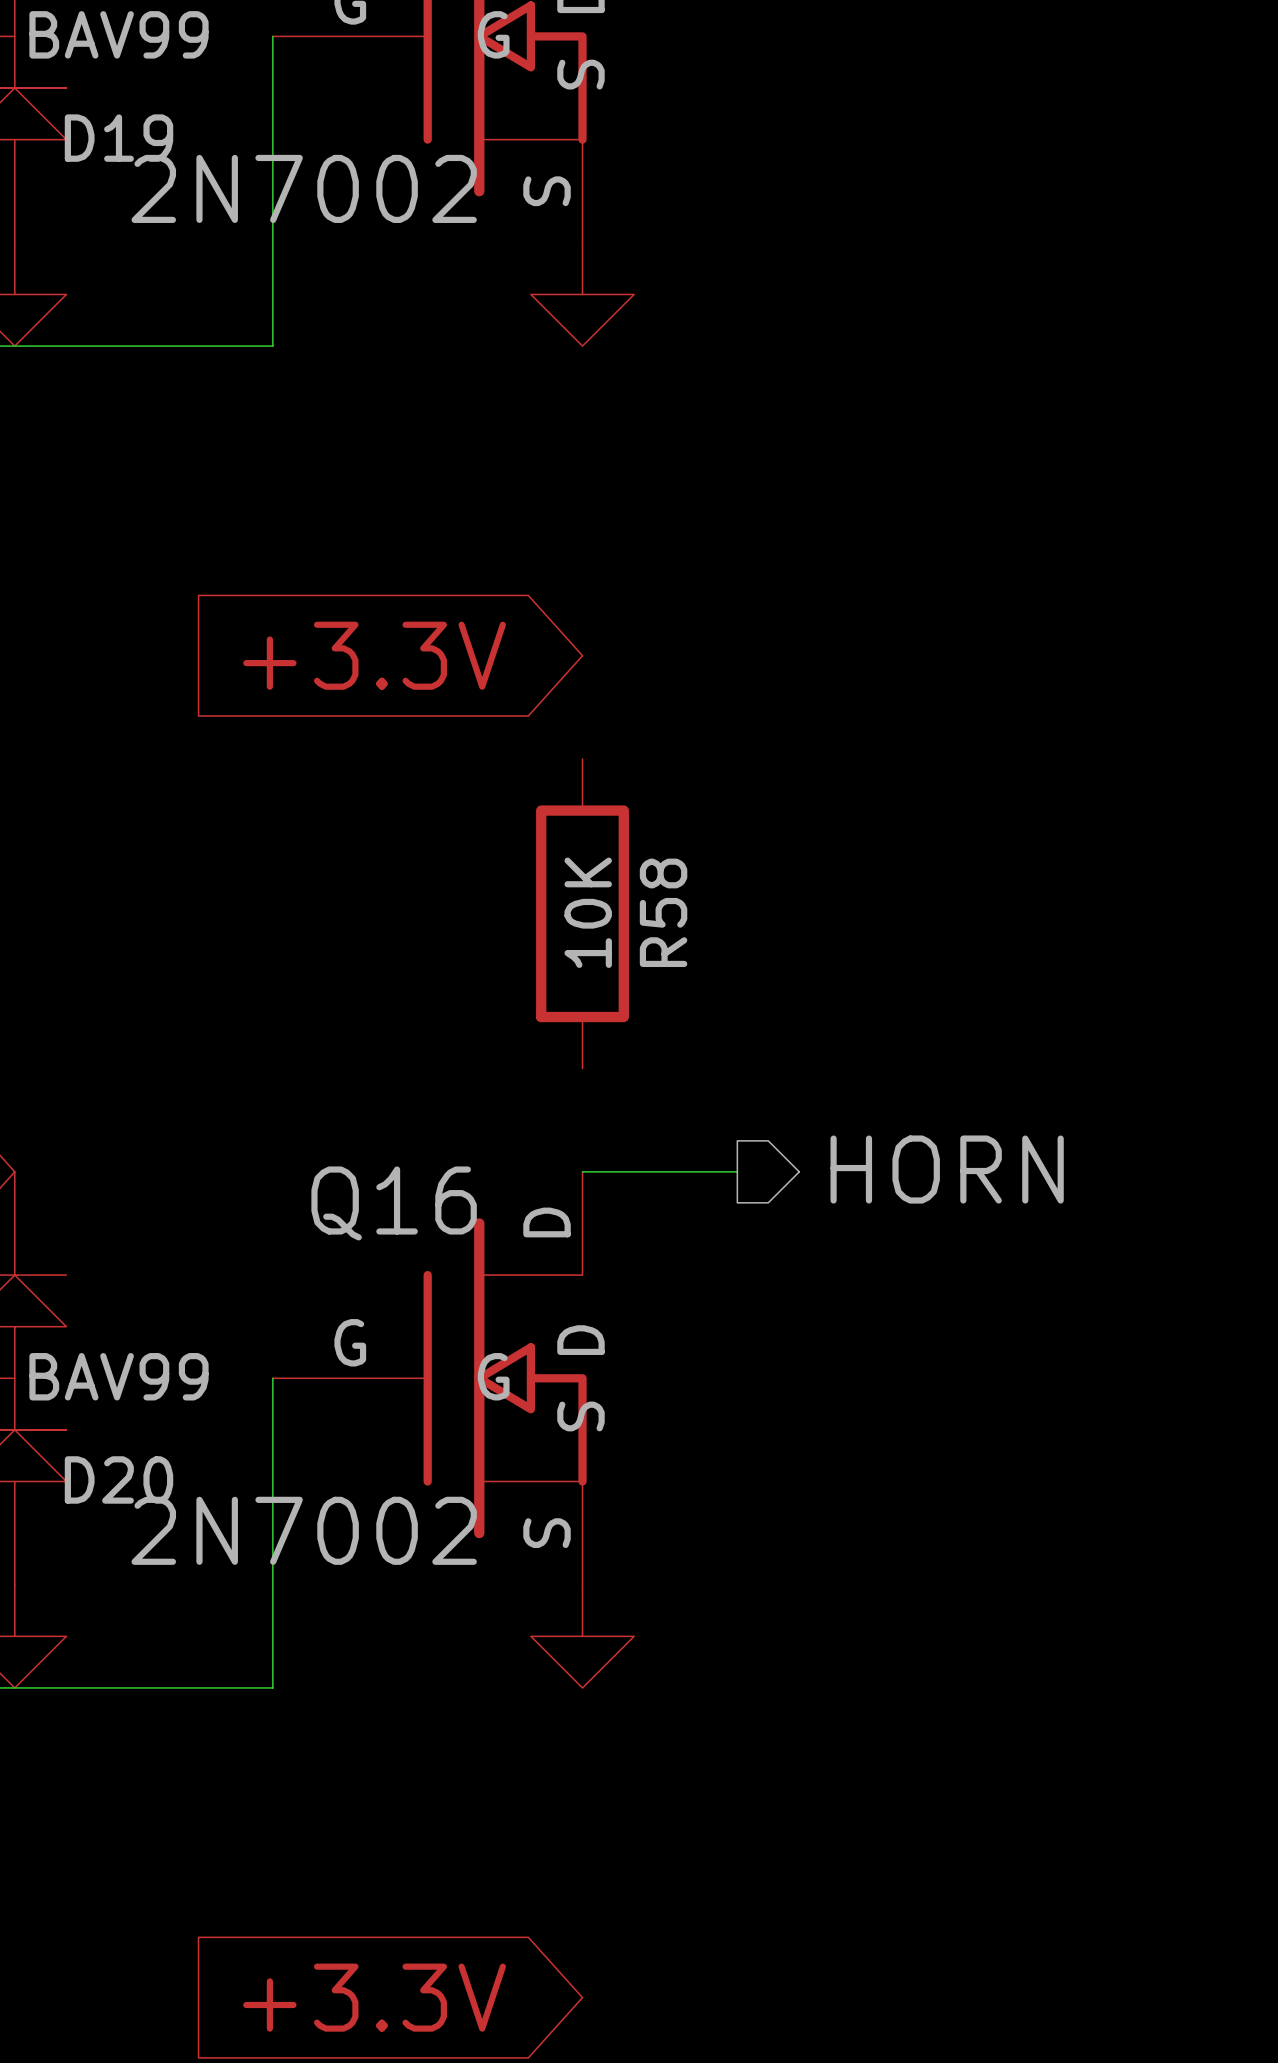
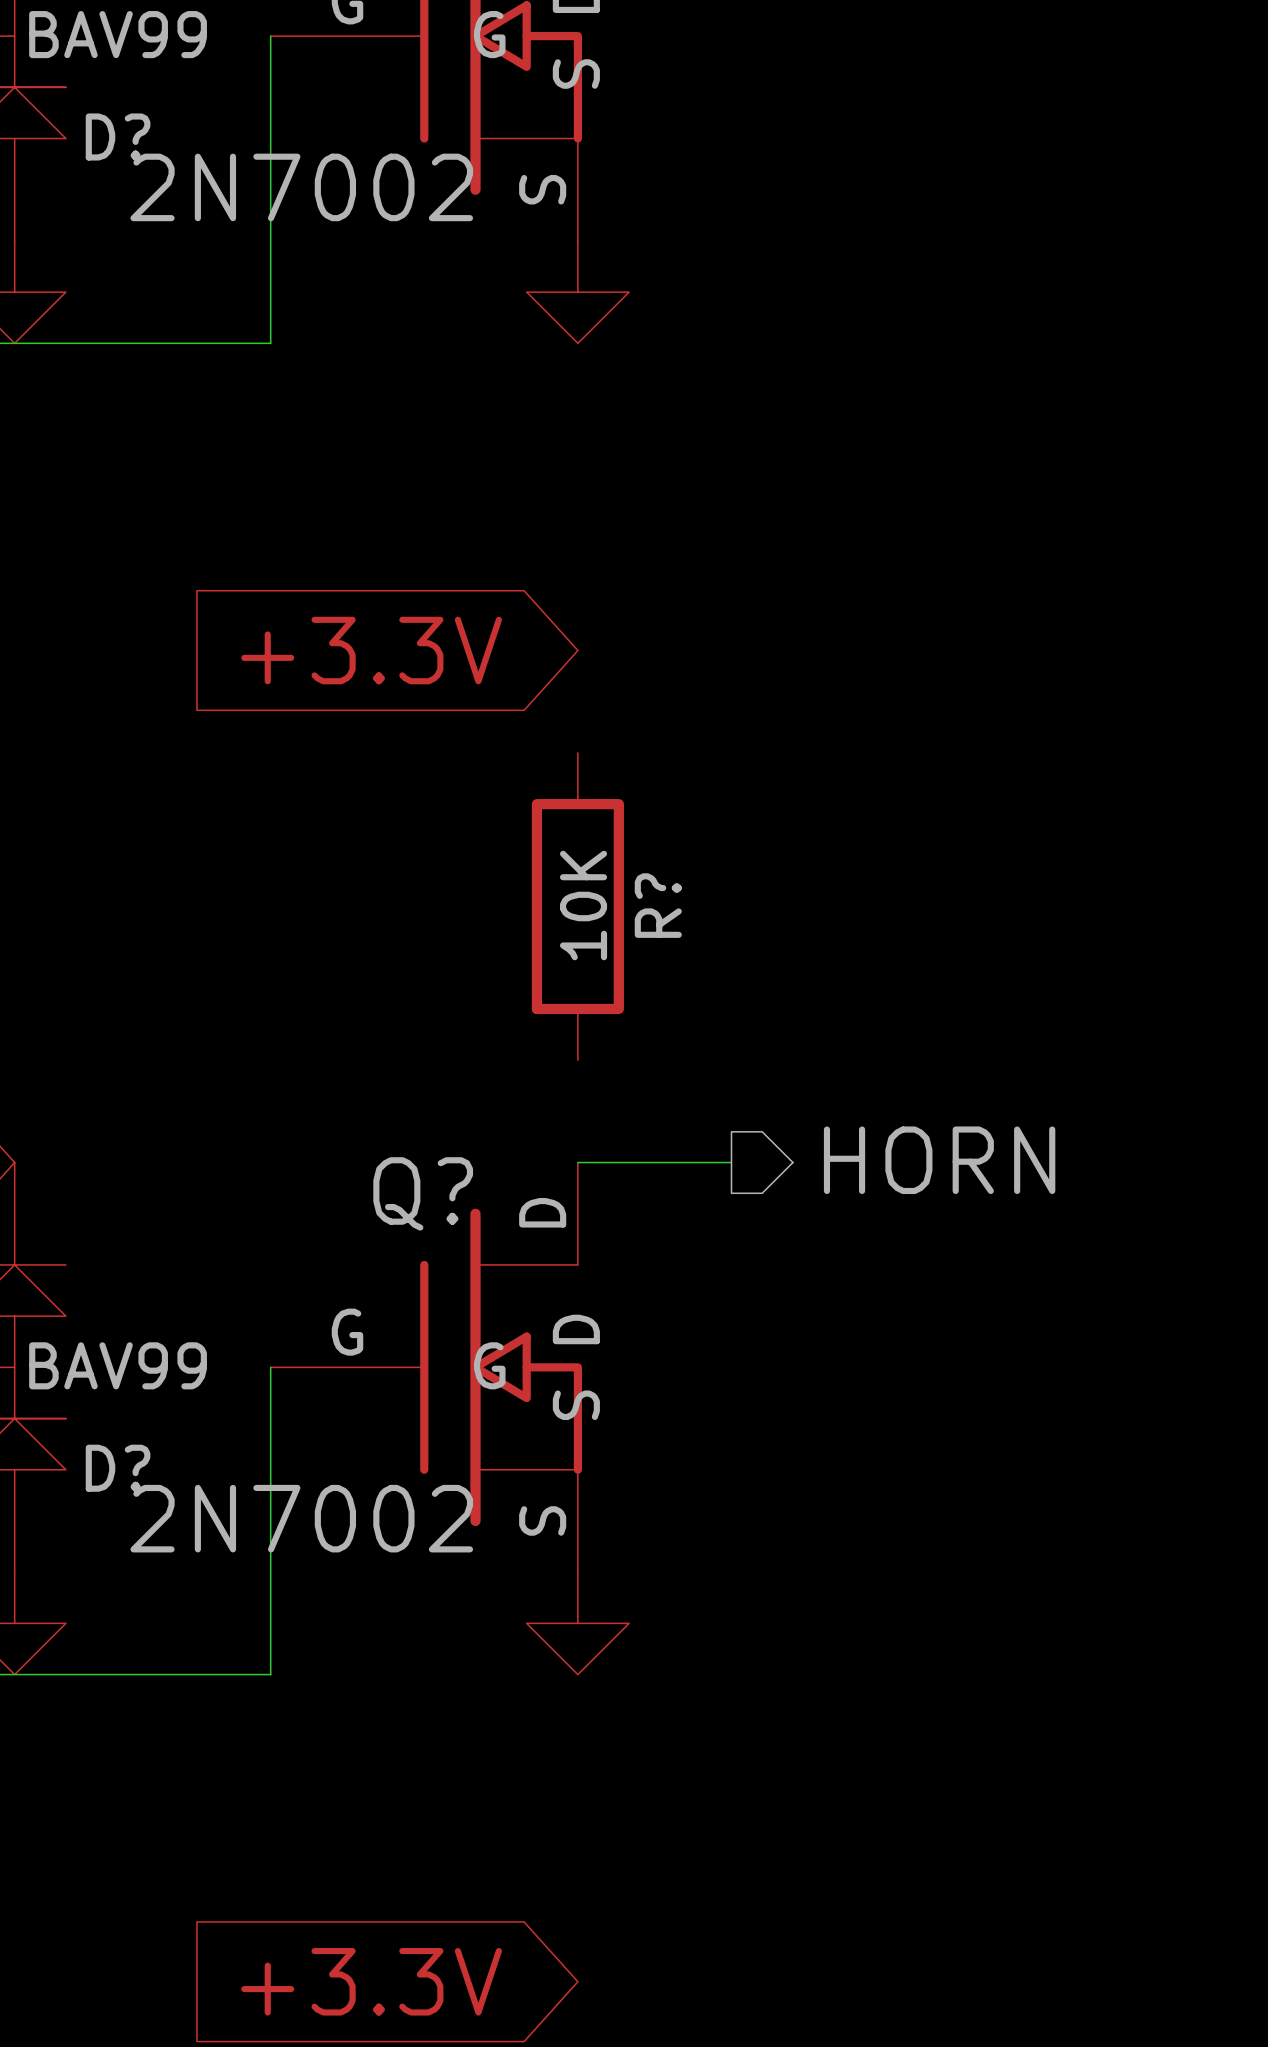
D19 name: D19 (119, 138) -> D? (118, 136)
R58 name: R58 (663, 912) -> R? (658, 905)
Q16 name: Q16 (394, 1203) -> Q? (423, 1193)
D20 name: D20 (119, 1479) -> D? (118, 1468)

